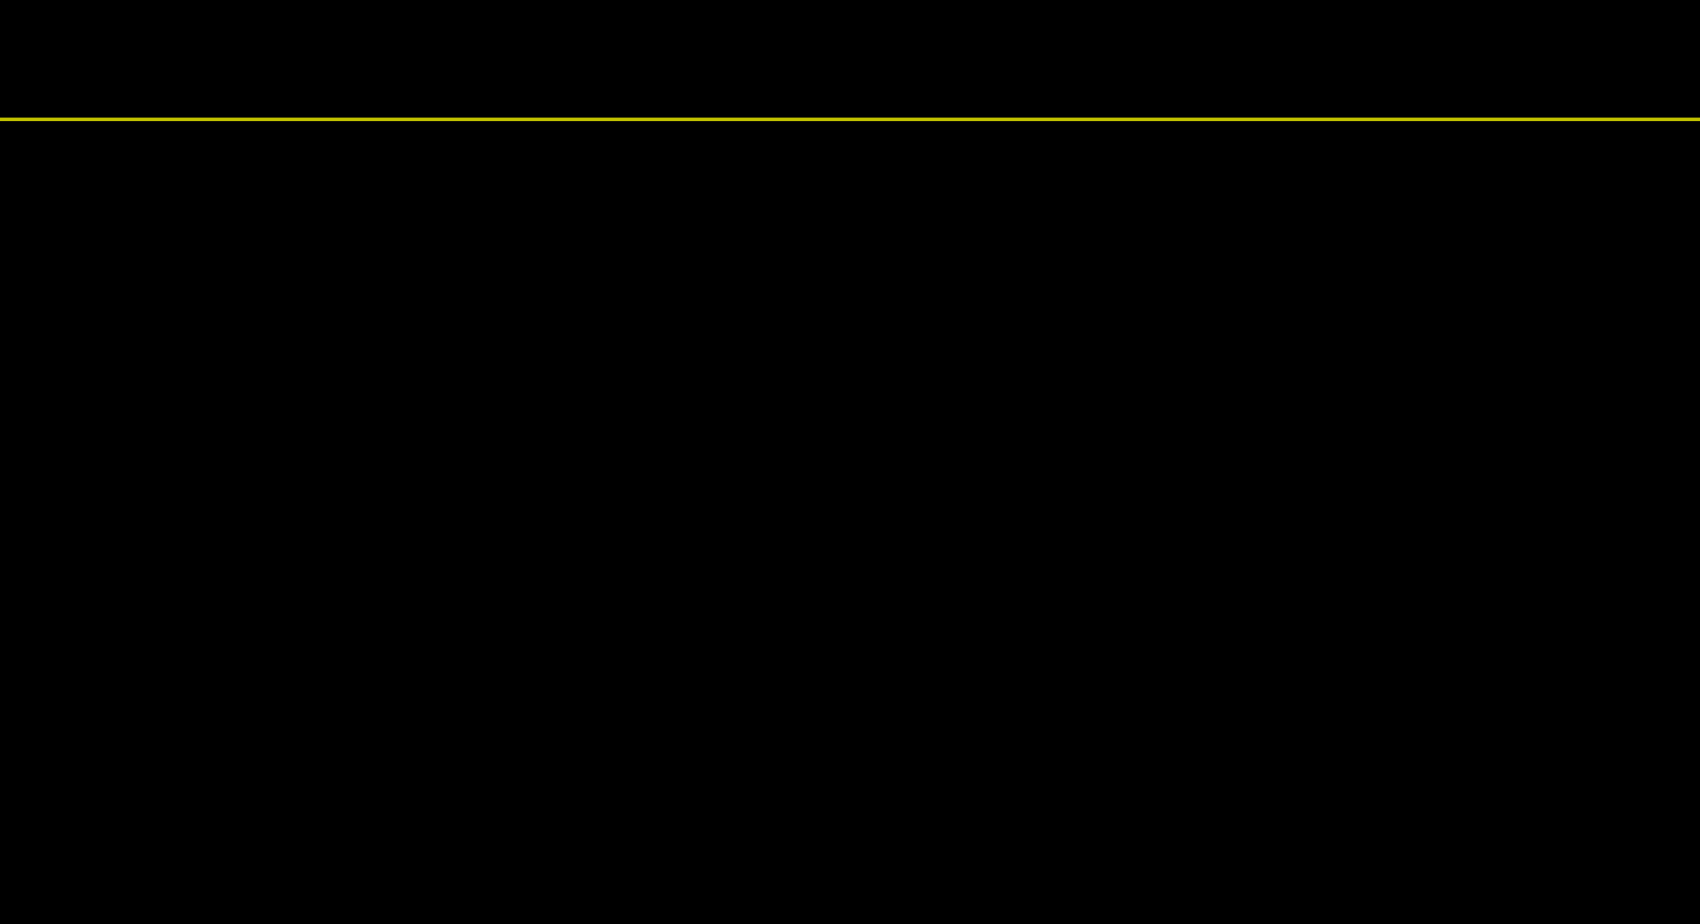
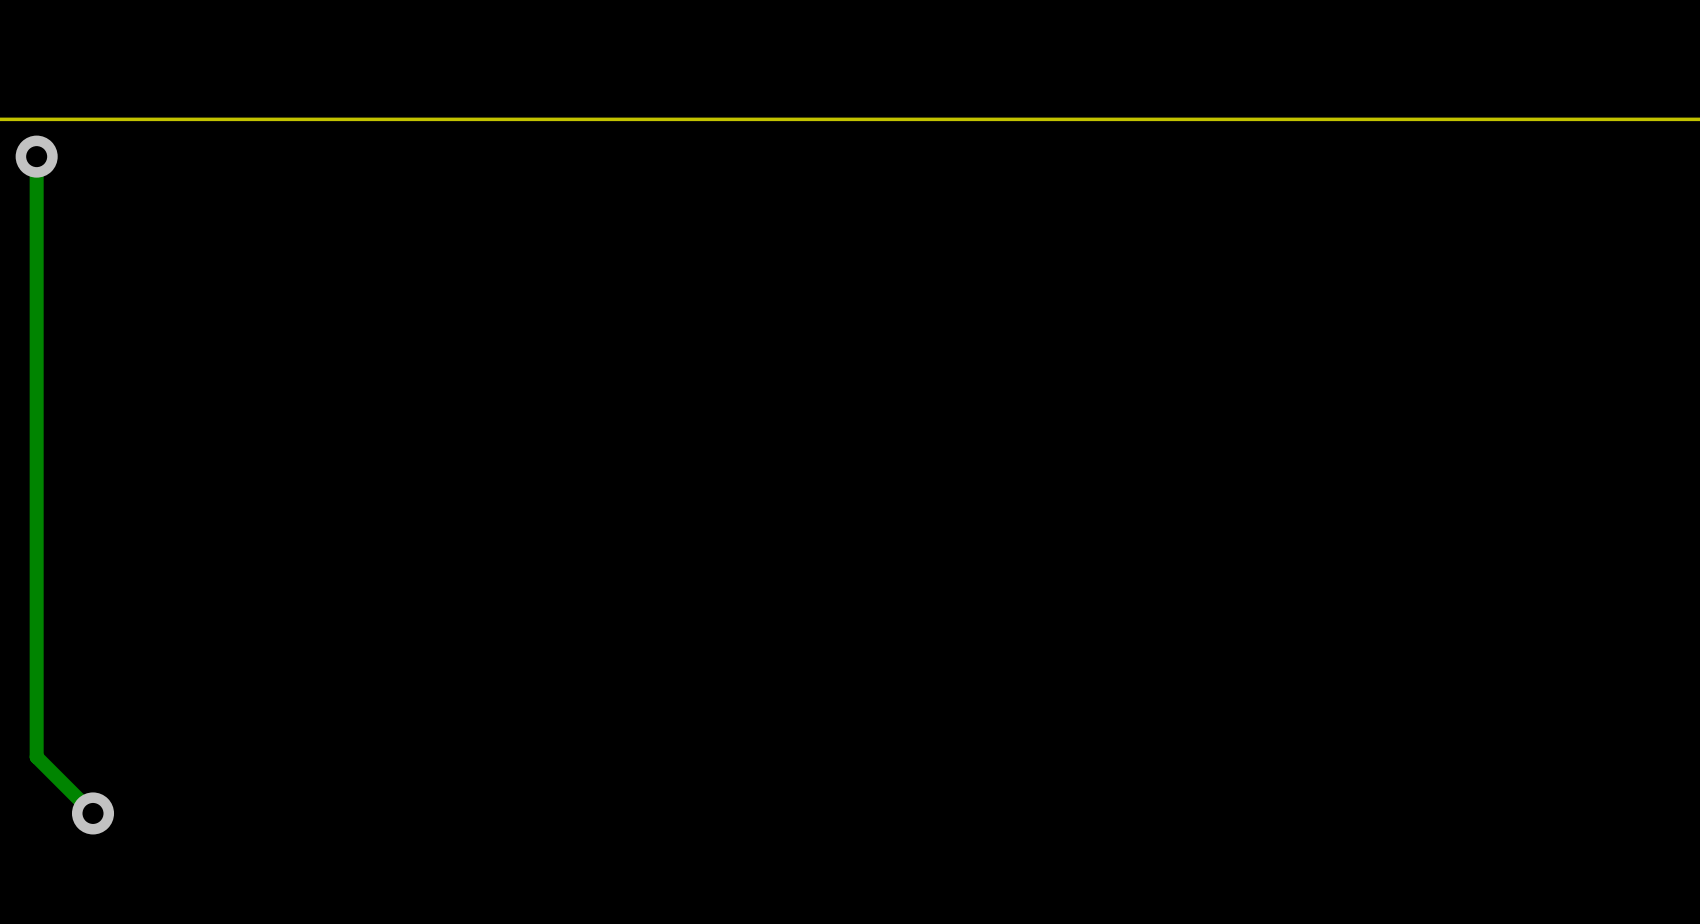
track: none -> (36, 156) (36, 757) (93, 813)
via: none -> (36, 156)
via: none -> (93, 813)

